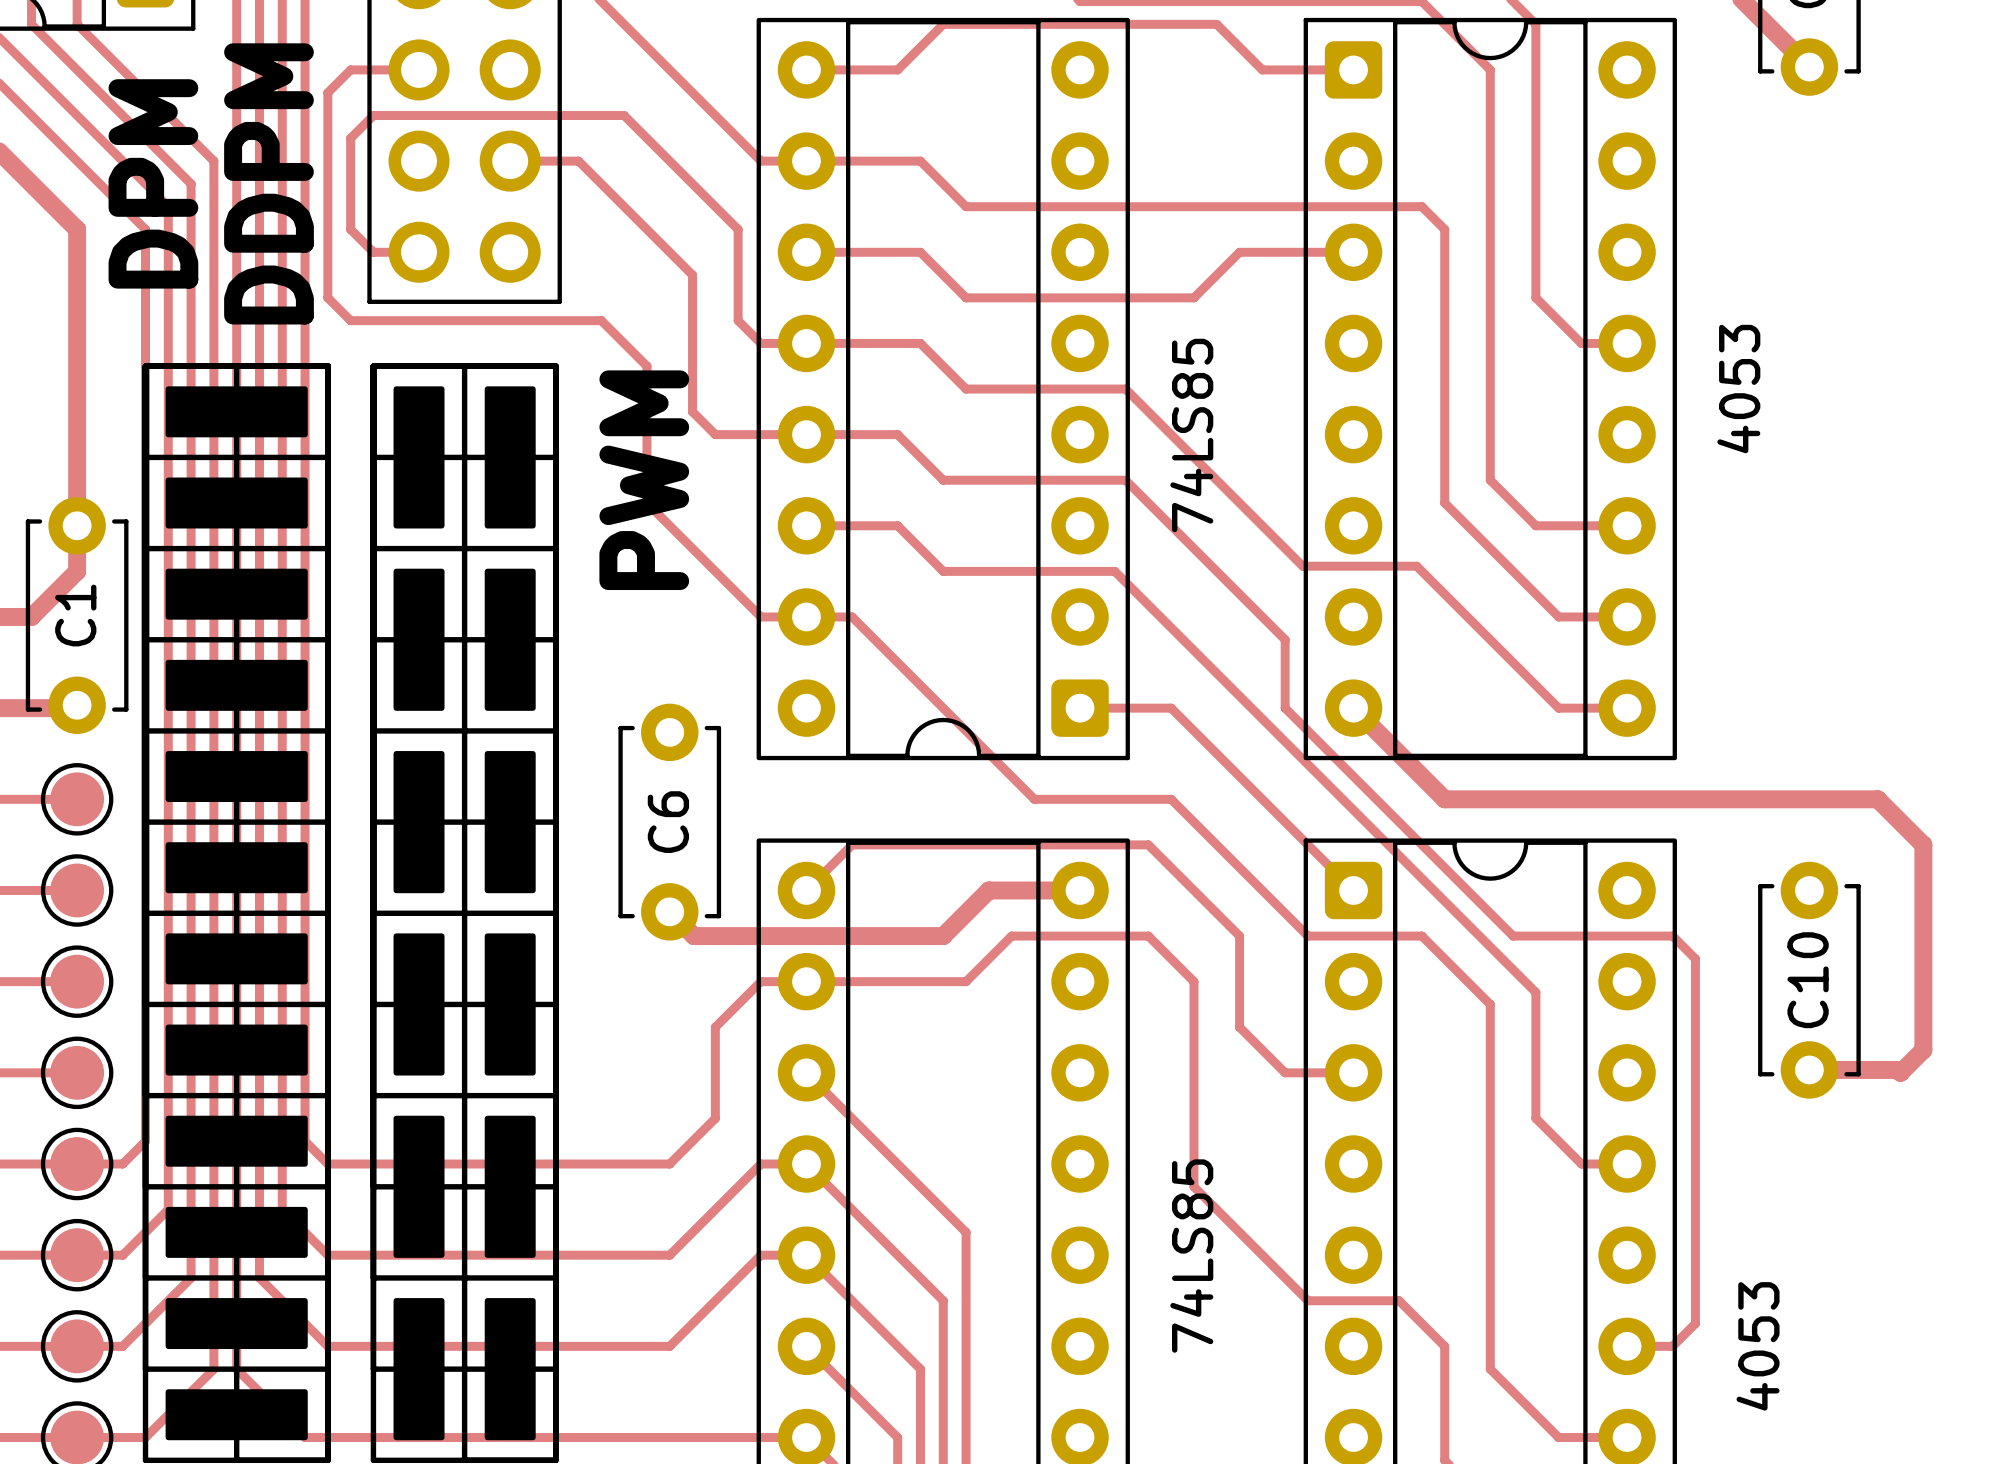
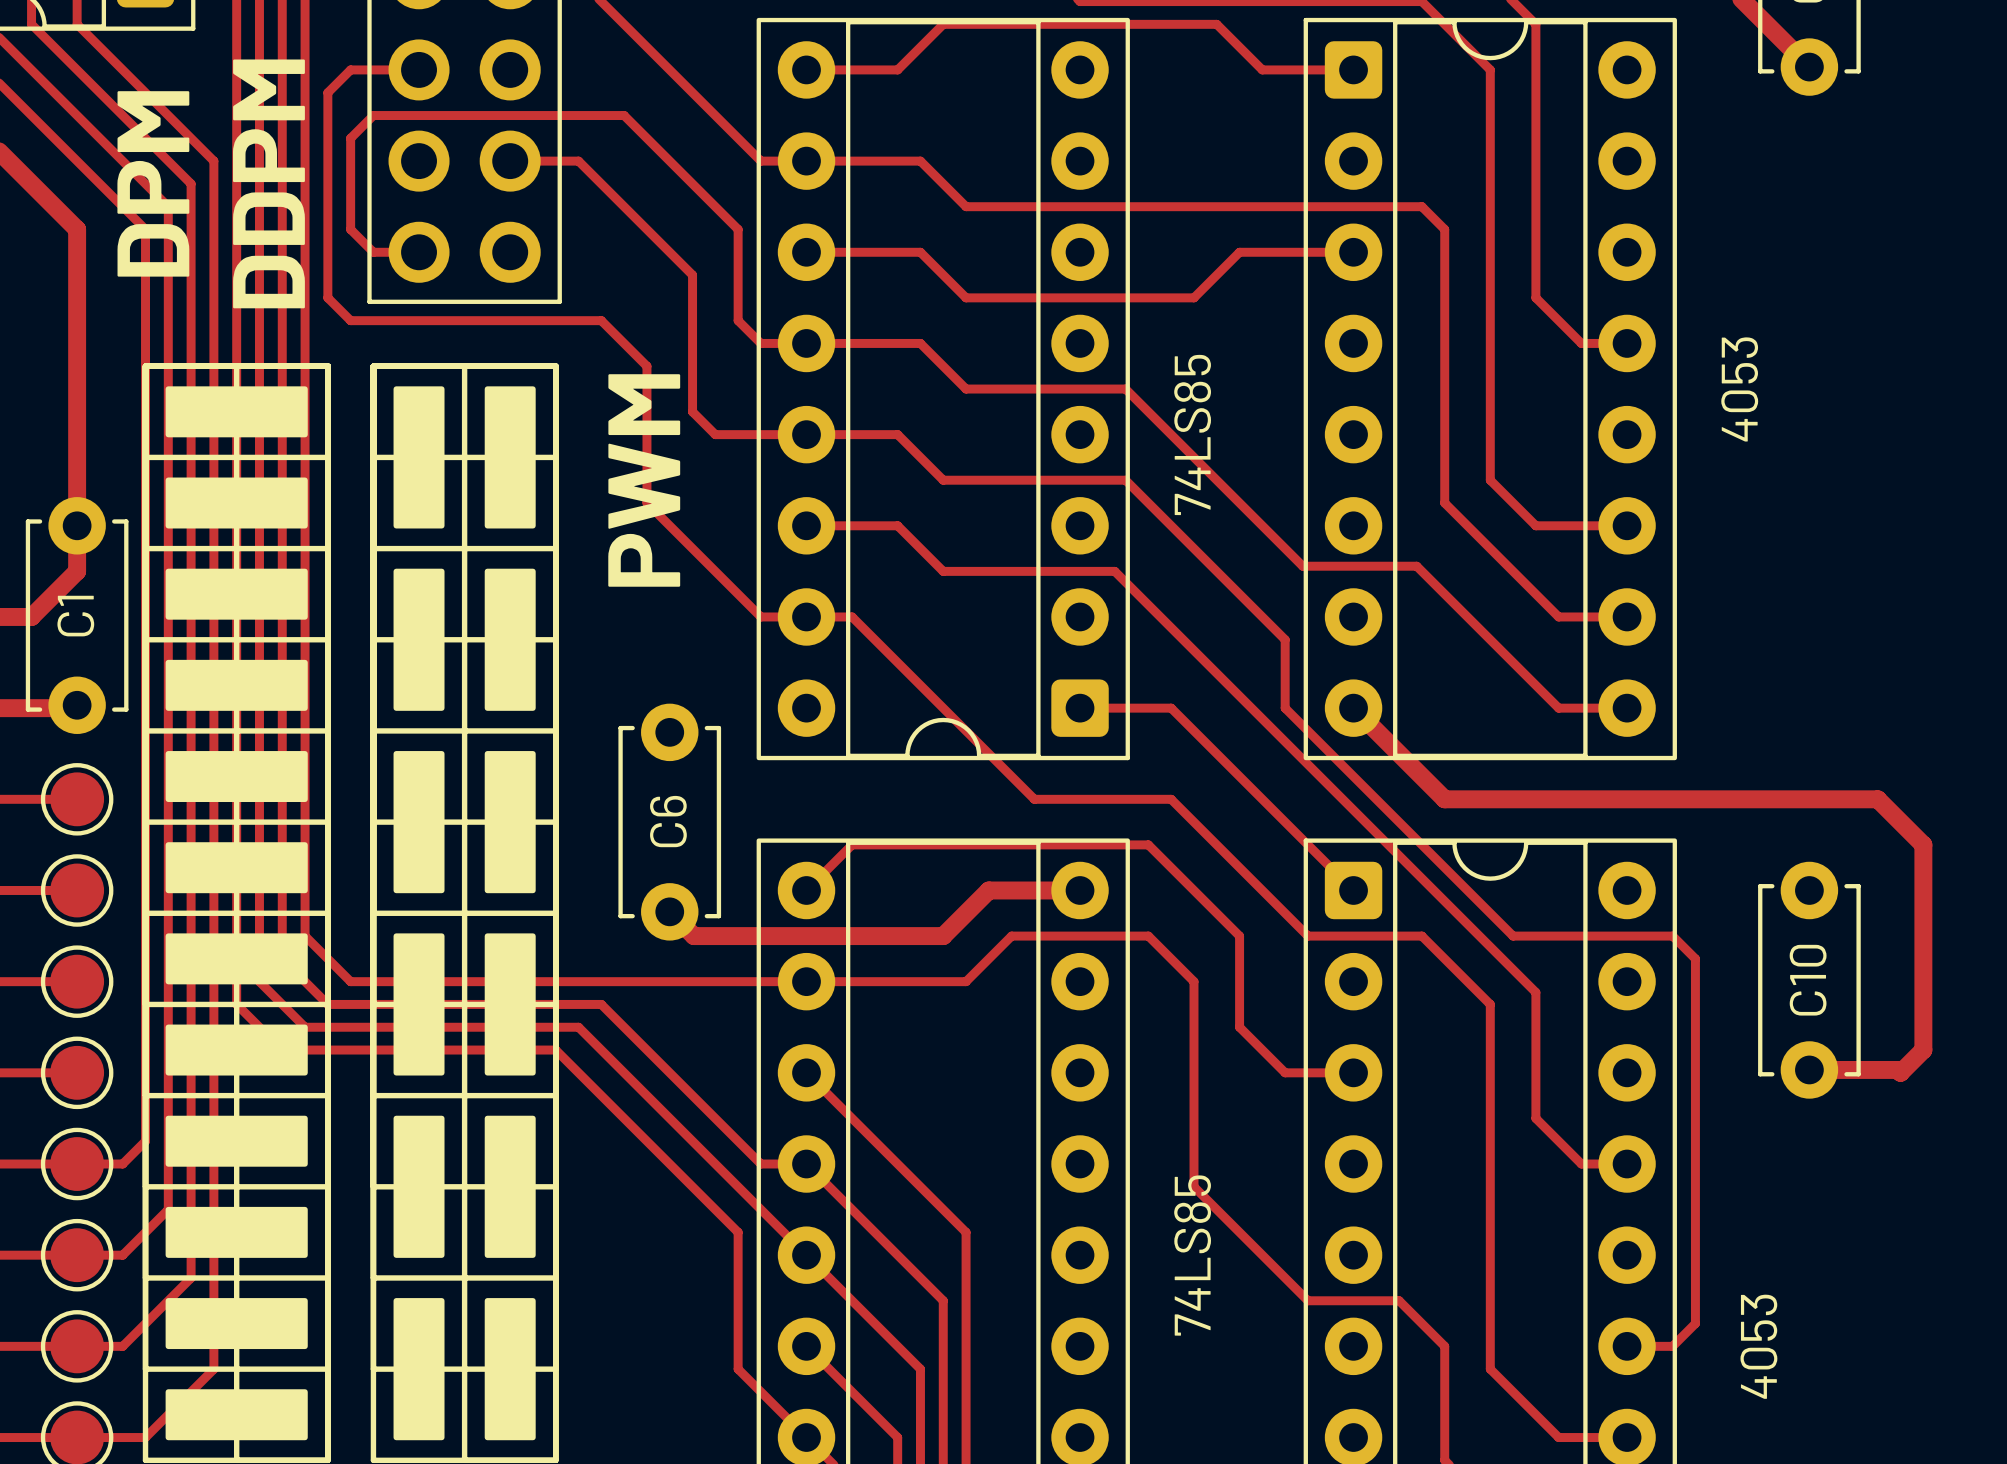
track: (305, 936) (305, 1141) (327, 1164) (669, 1164) (715, 1118) (715, 1027) (760, 981) -> (305, 936) (350, 981) (760, 981)
track: (282, 958) (282, 1209) (327, 1255) (669, 1255) (760, 1164) -> (282, 958) (327, 1004) (601, 1004) (760, 1164)
track: (259, 981) (259, 1277) (327, 1346) (669, 1346) (760, 1255) (806, 1255) -> (259, 981) (305, 1027) (578, 1027) (806, 1255)
track: (236, 1004) (236, 1369) (305, 1437) (806, 1437) -> (236, 1004) (282, 1050) (555, 1050) (738, 1232) (738, 1369) (806, 1437)

